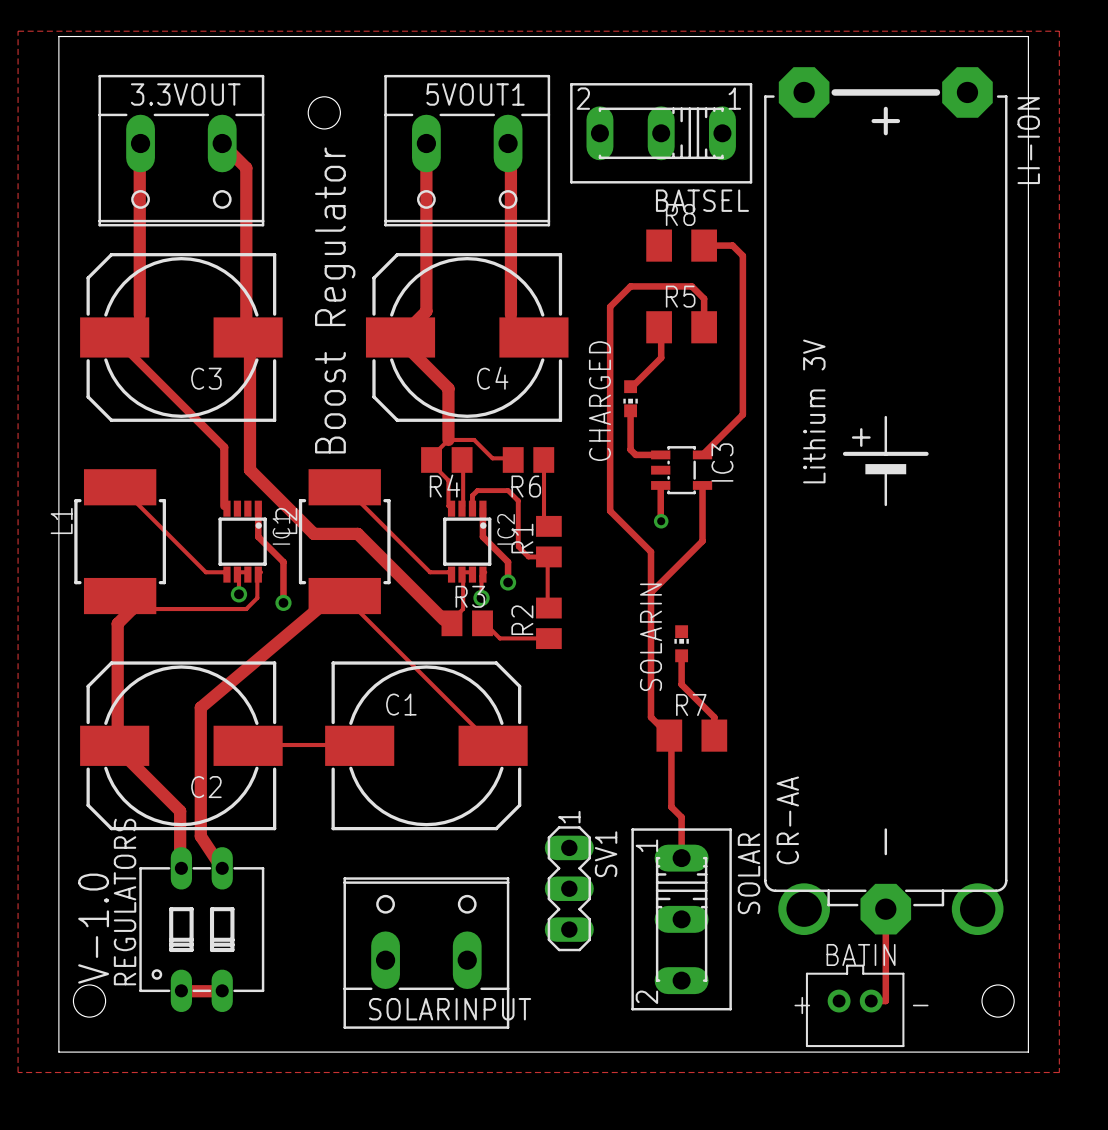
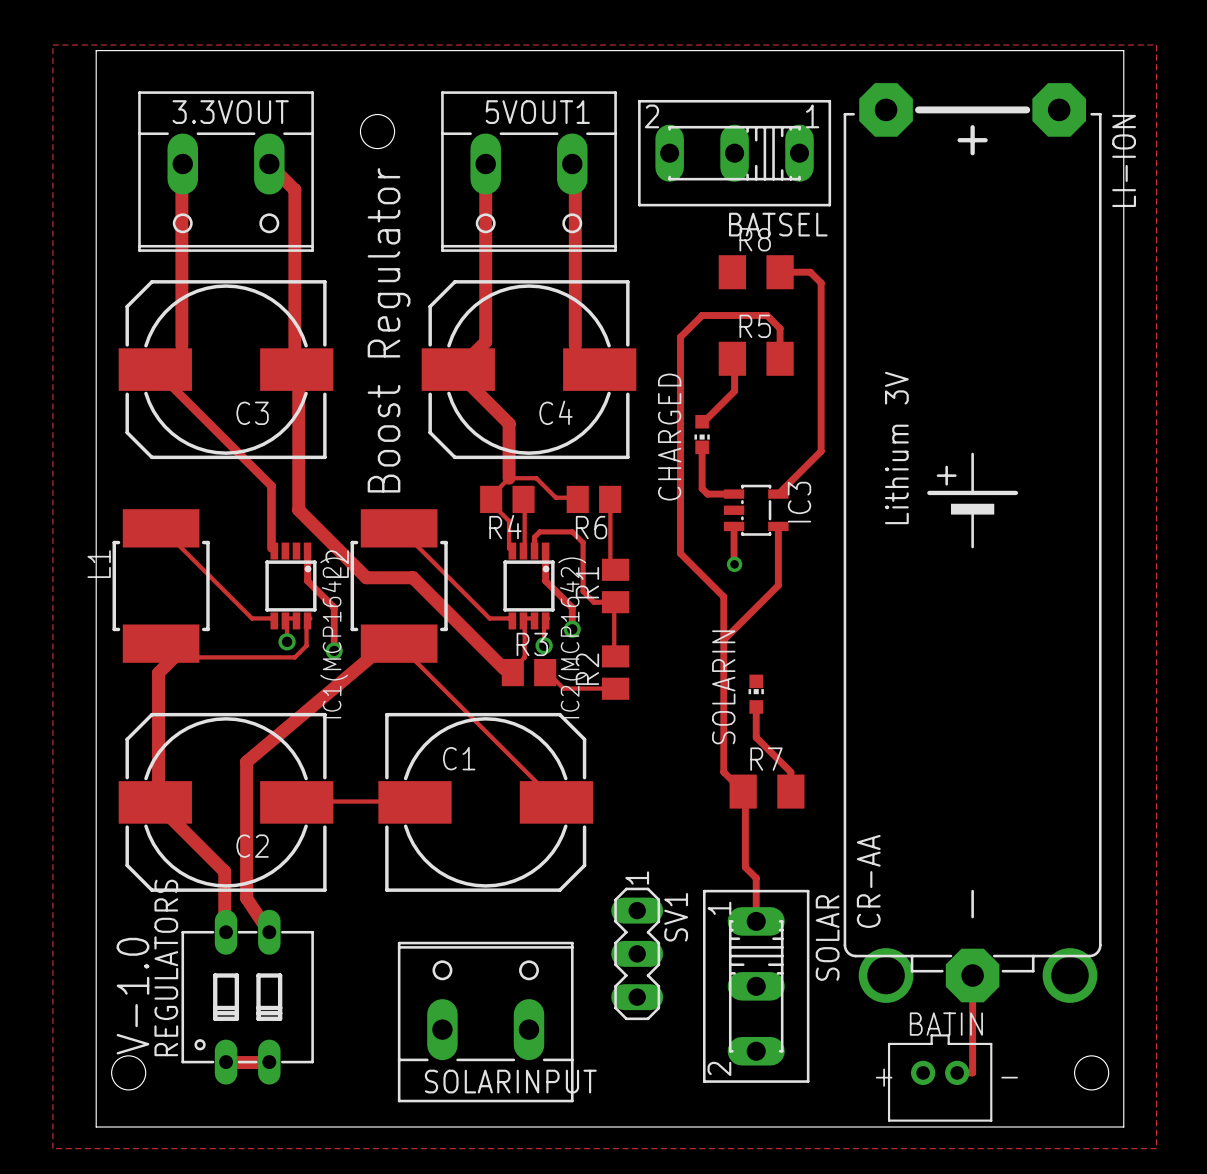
IC1 name: IC1 (281, 529) -> IC1(MCP1642) (334, 637)
IC2 name: IC2 (506, 529) -> IC2(MCP1642) (572, 637)

